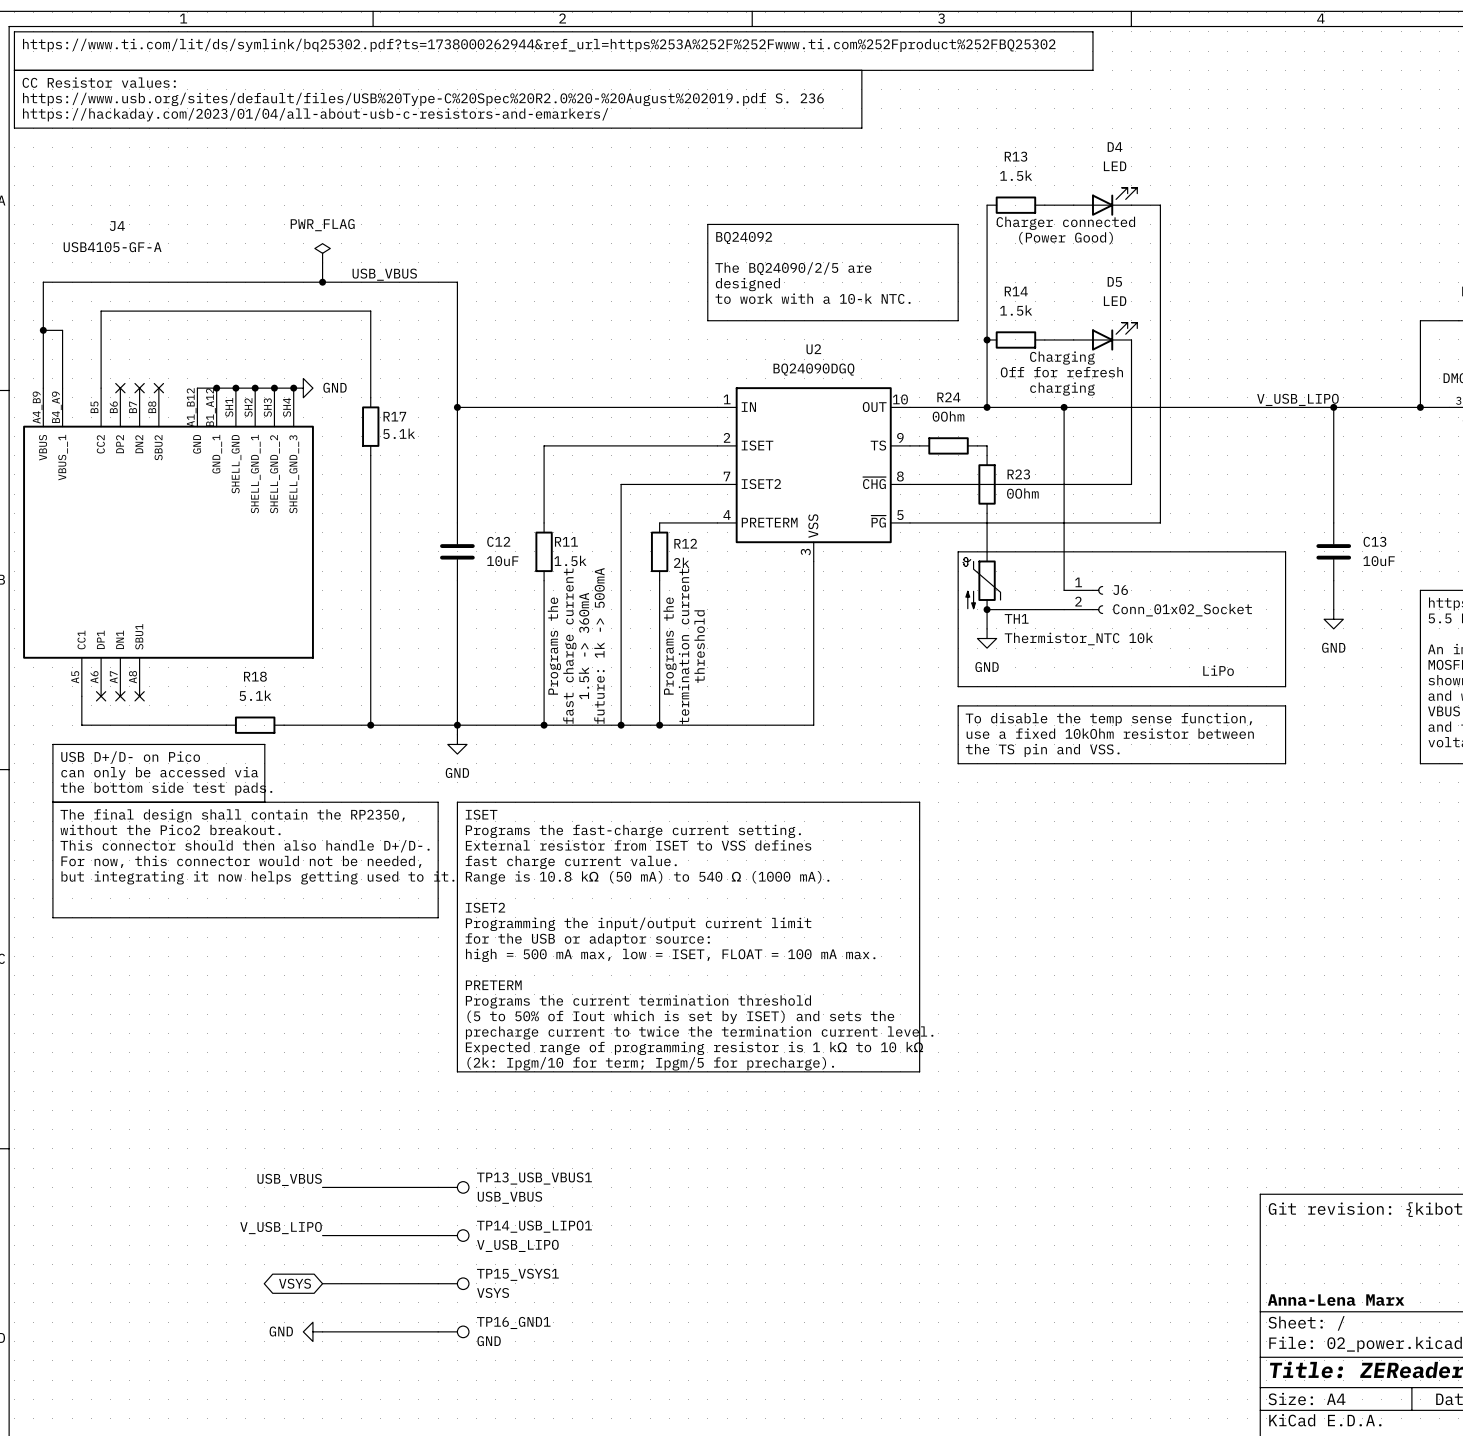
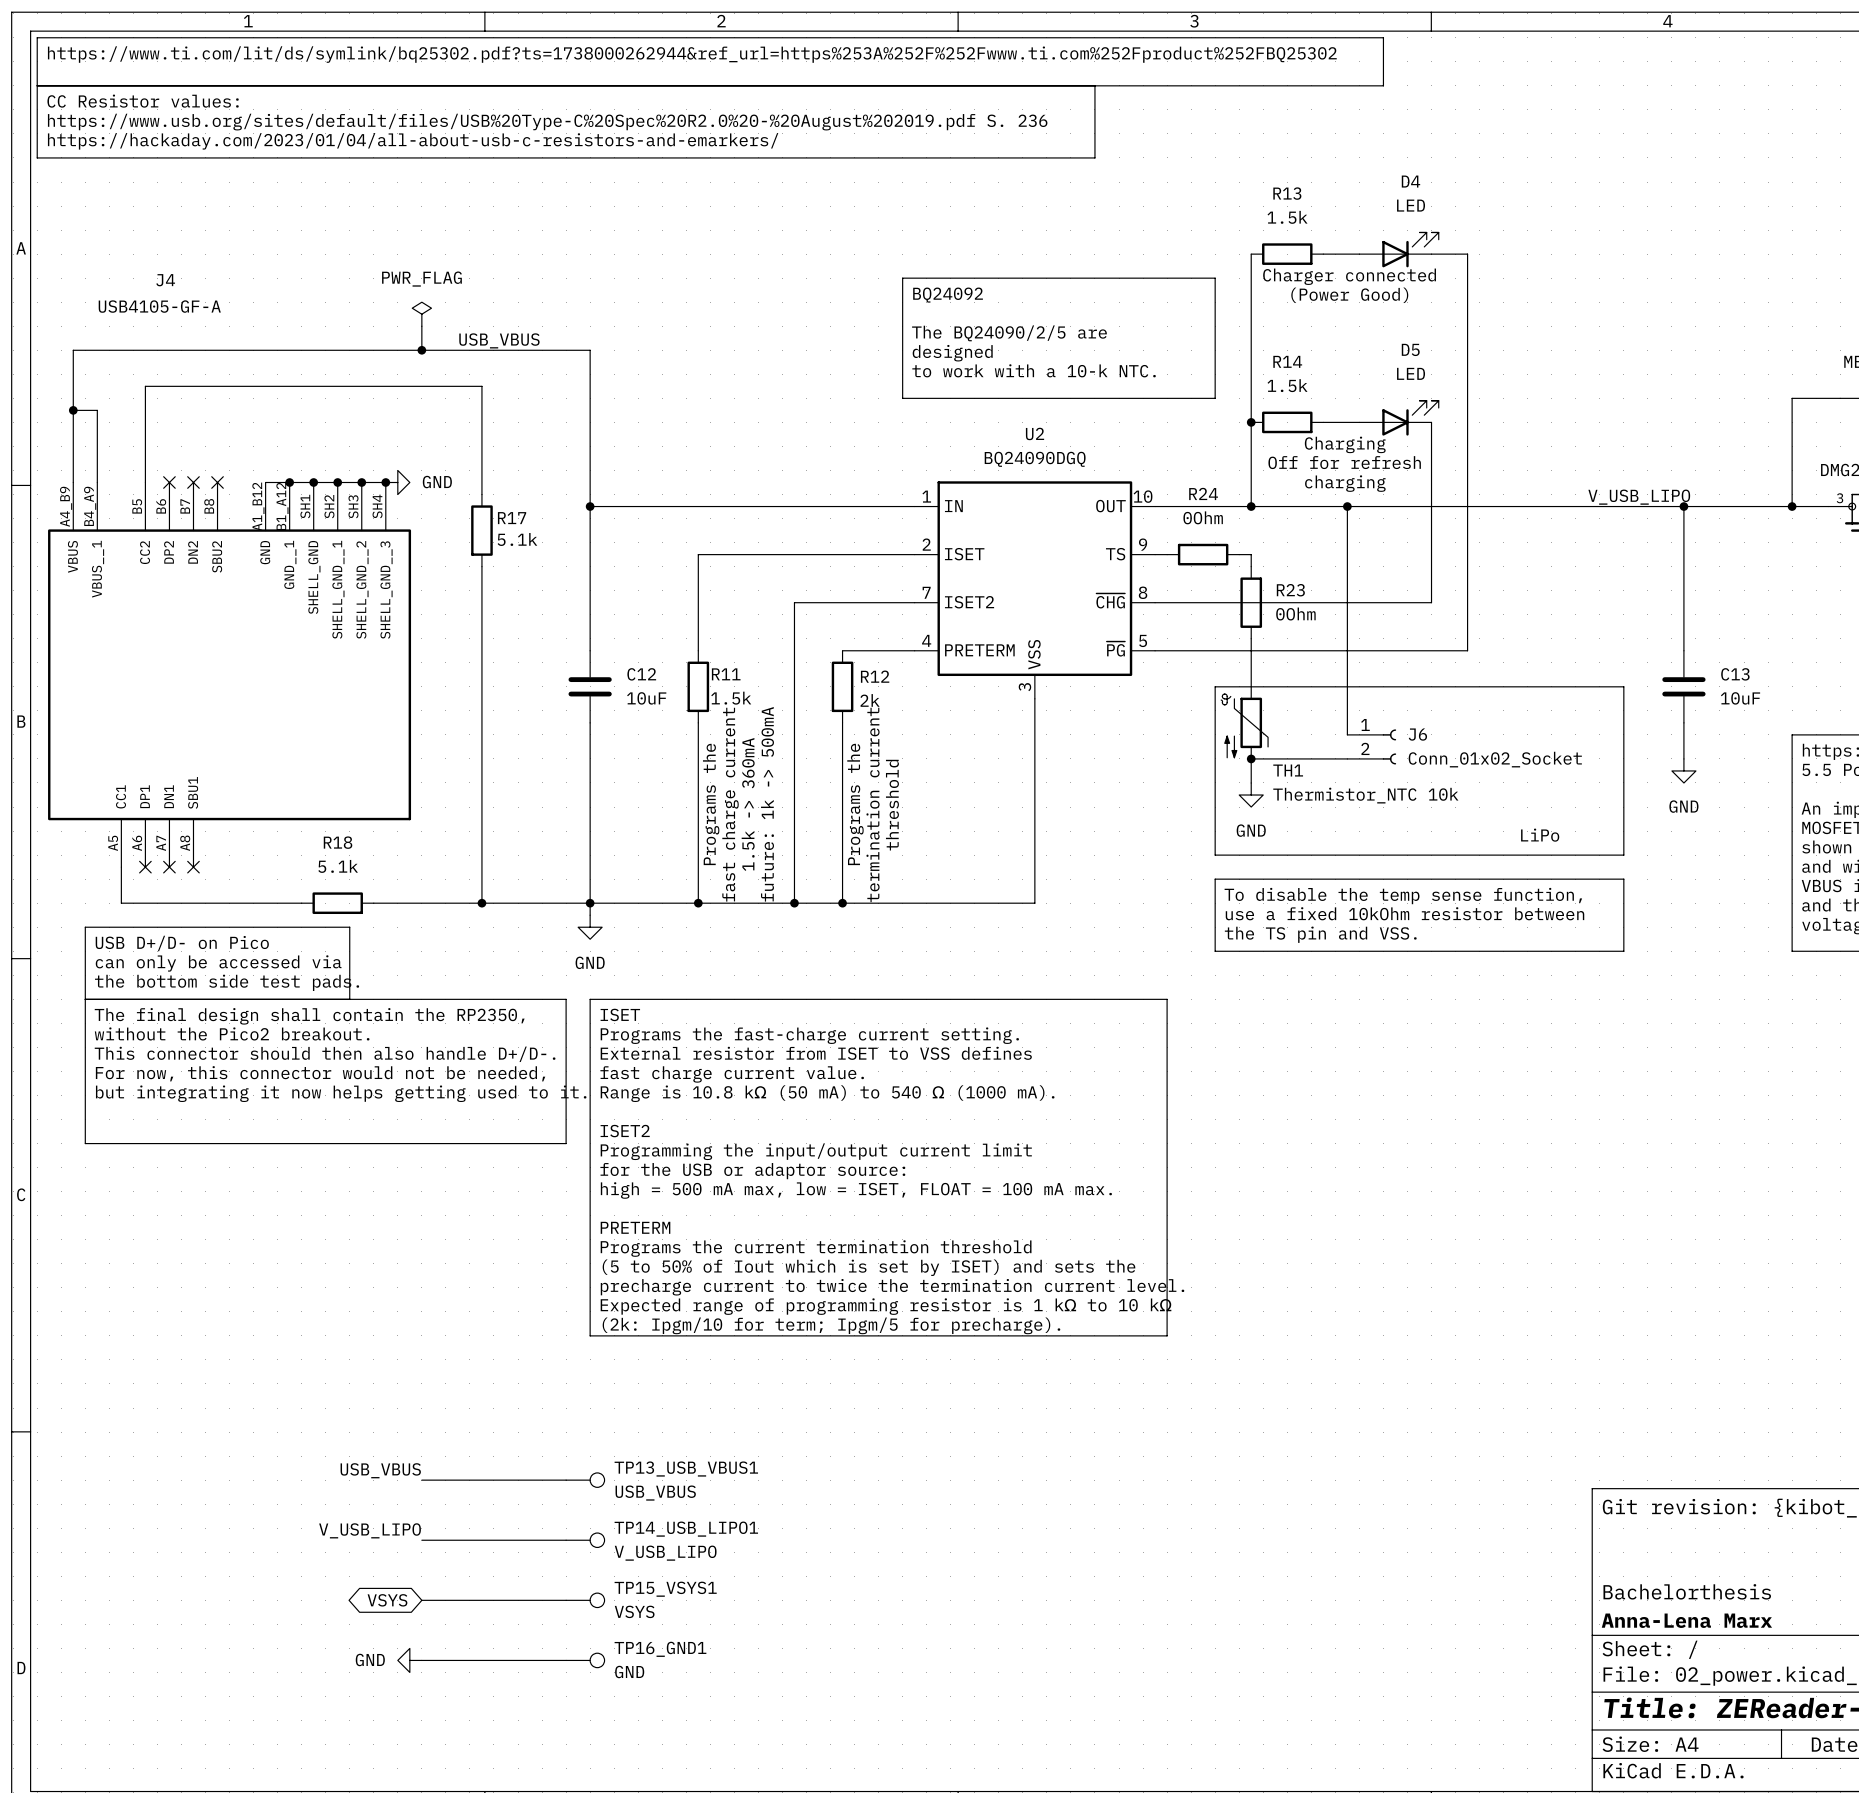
title block: none -> Bachelorthesis (1687, 1591)

